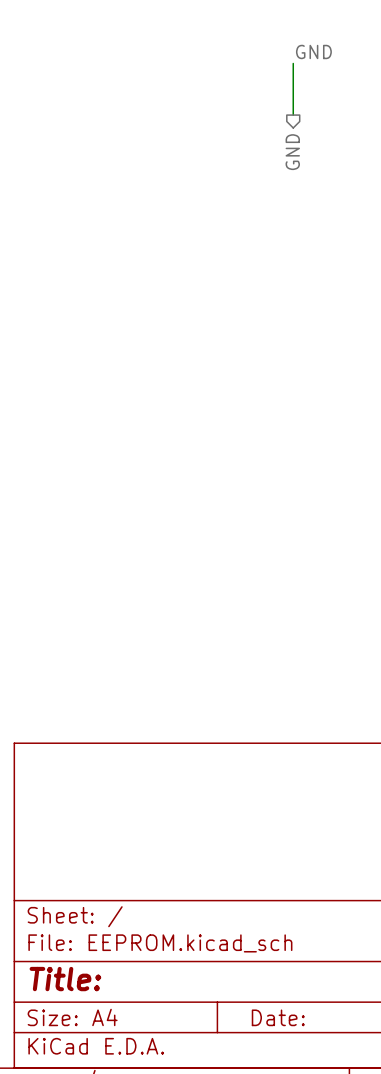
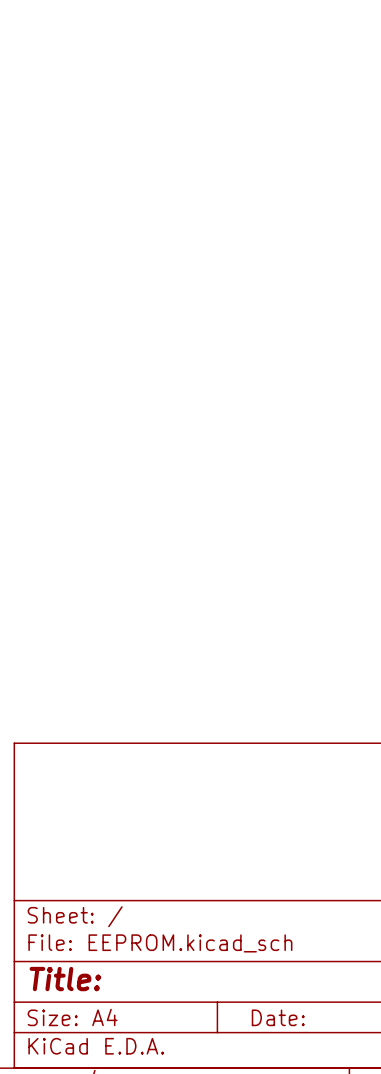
label: GND (313, 51) -> none
wire: (293, 63) (293, 115) -> none
hierarchical label: GND (292, 152) -> none

